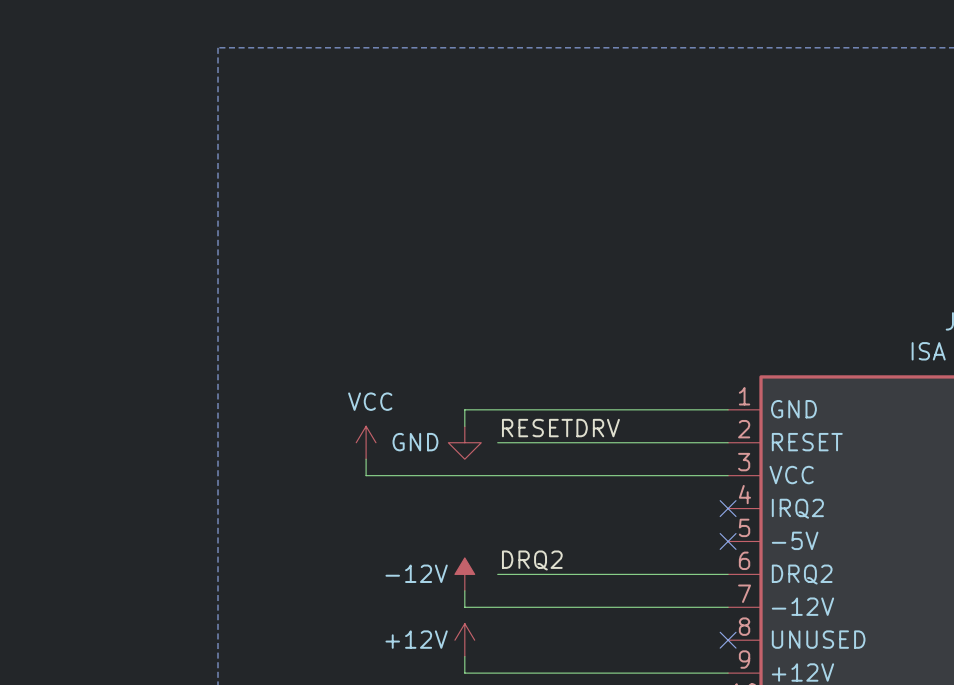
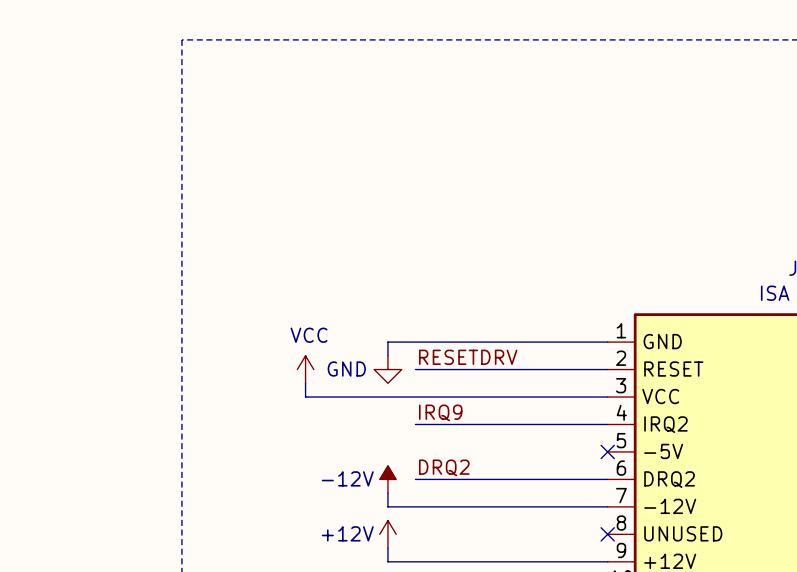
label: none -> IRQ9 (440, 412)
wire: none -> (415, 424) (607, 424)
no-connect mark: (728, 508) -> none

